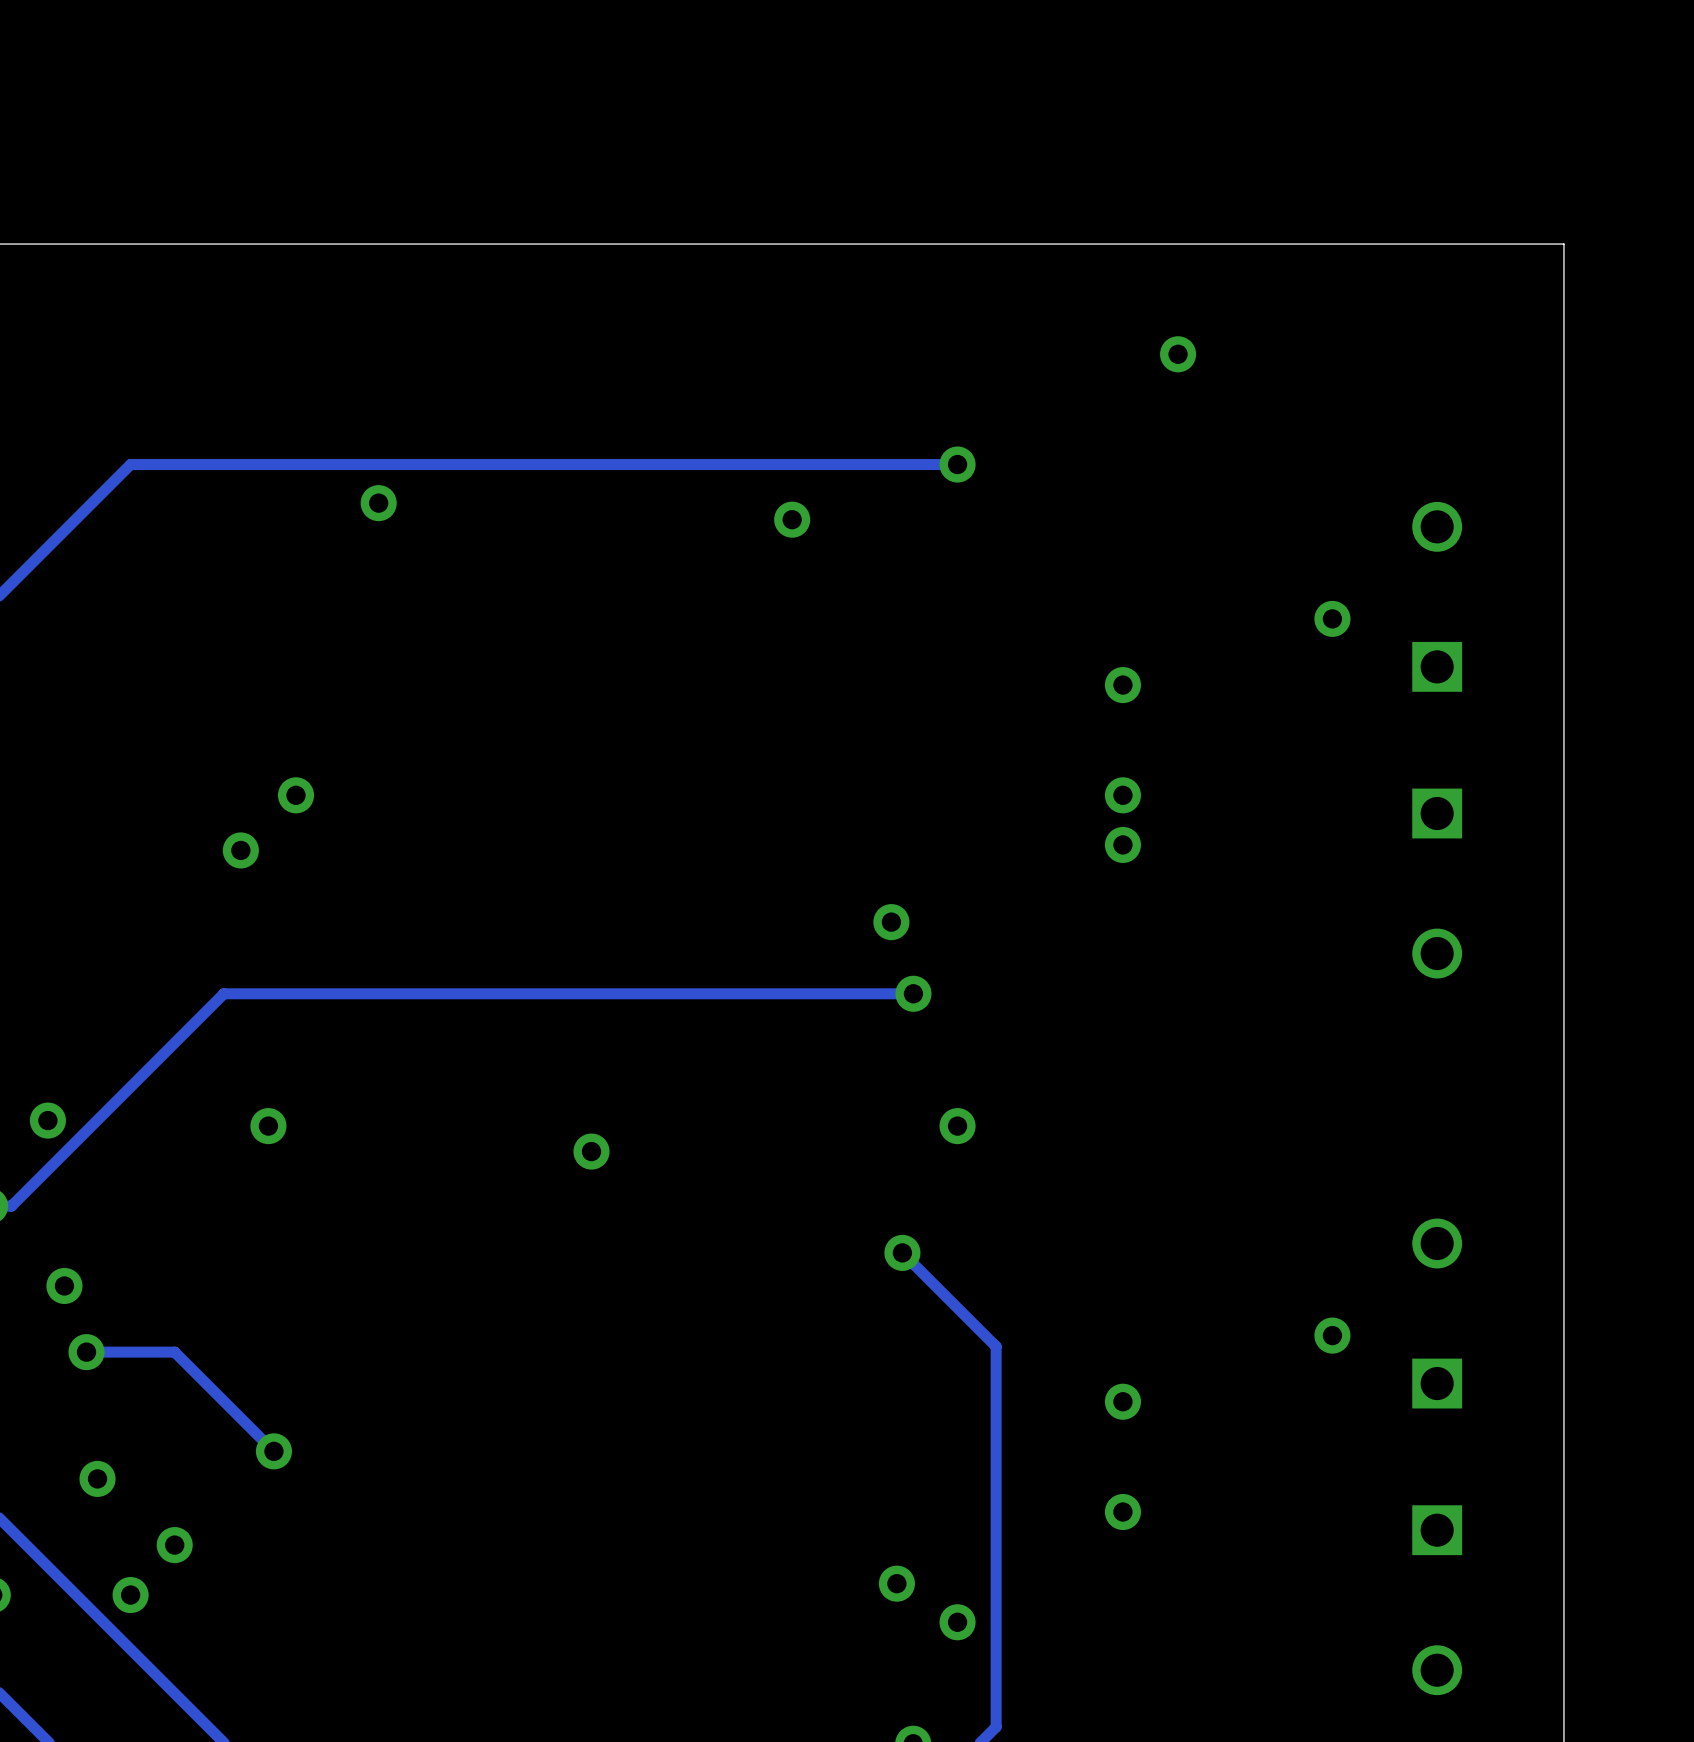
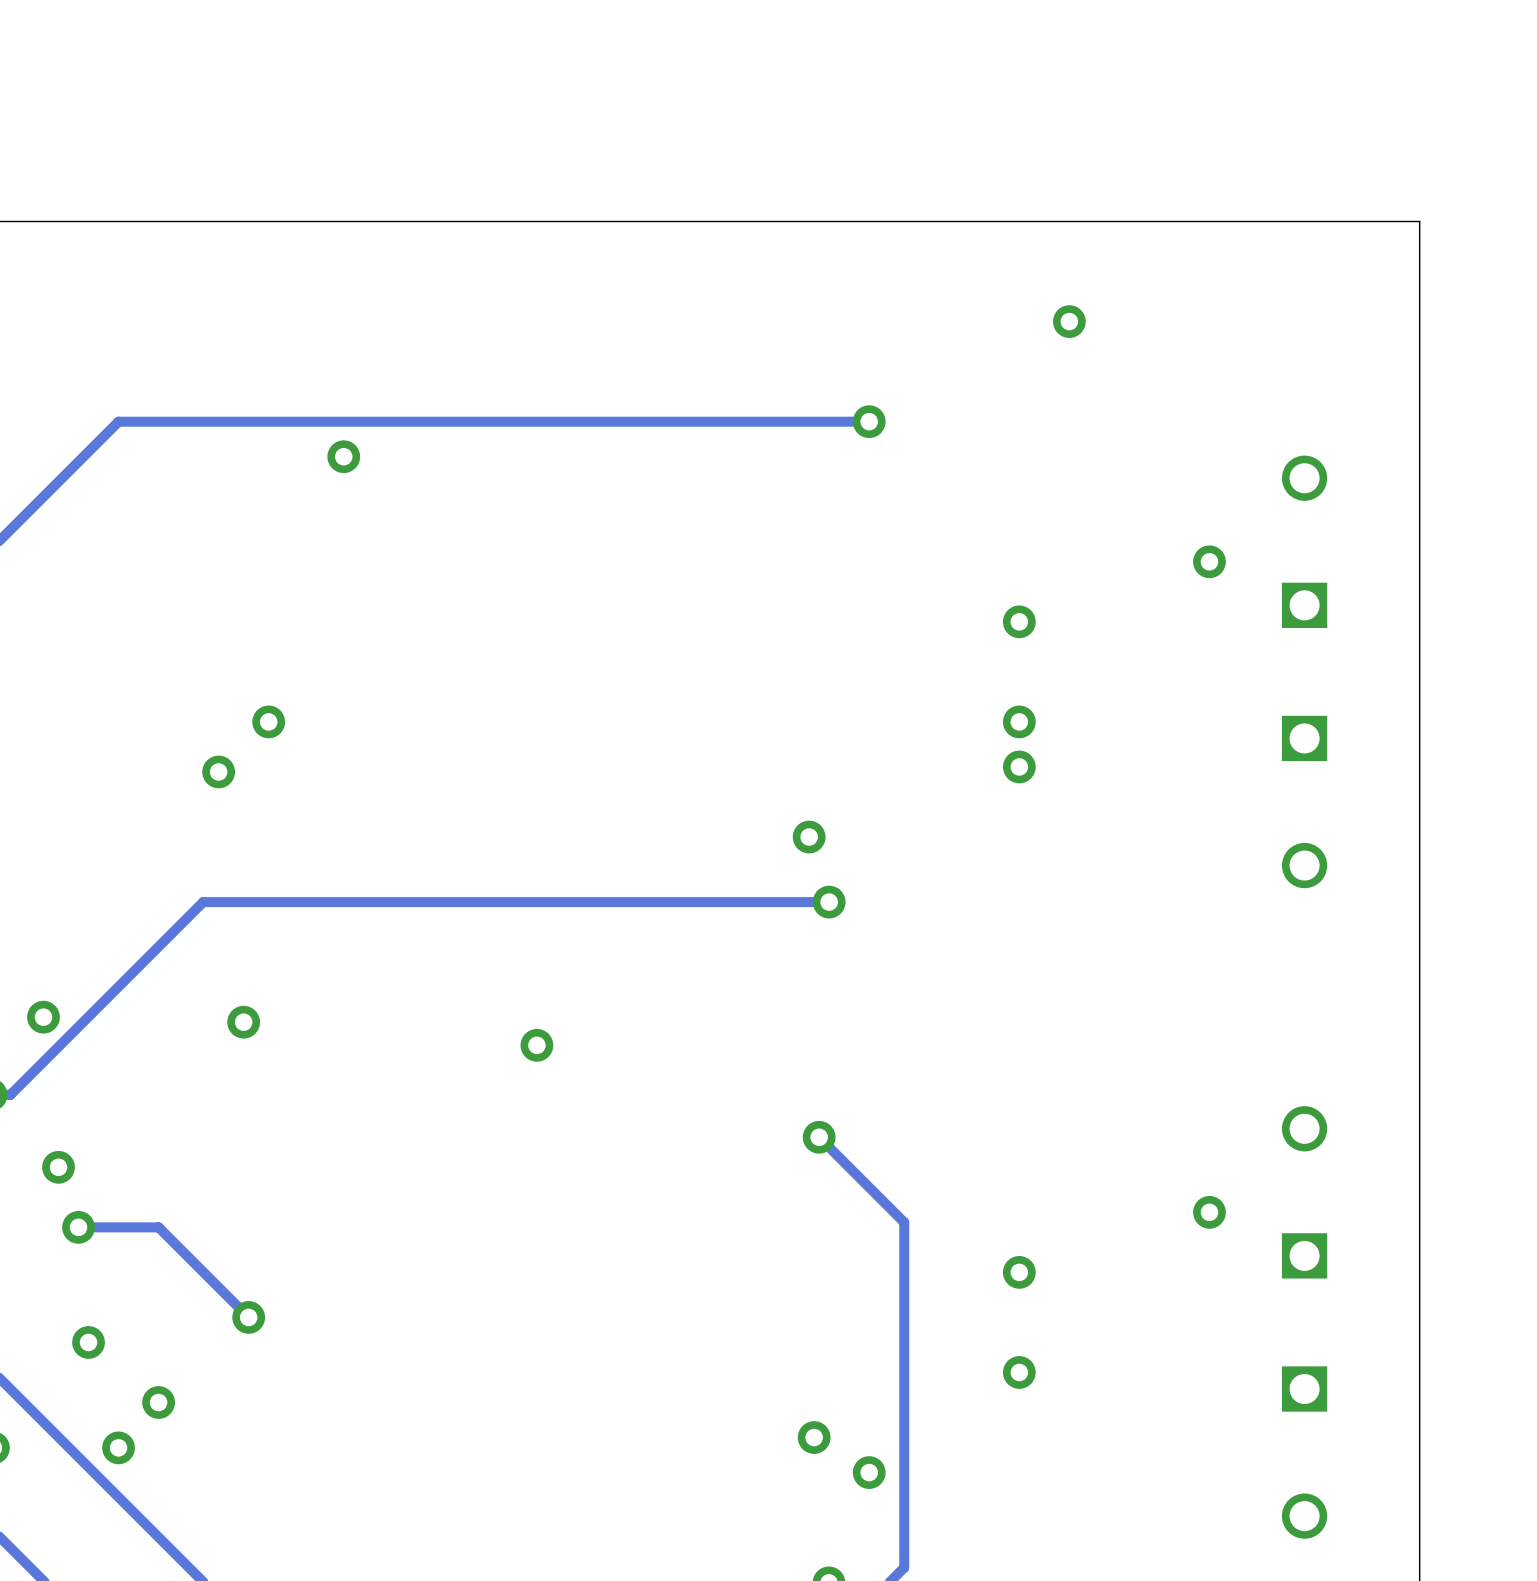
via: (792, 519) -> none
via: (957, 1126) -> none

